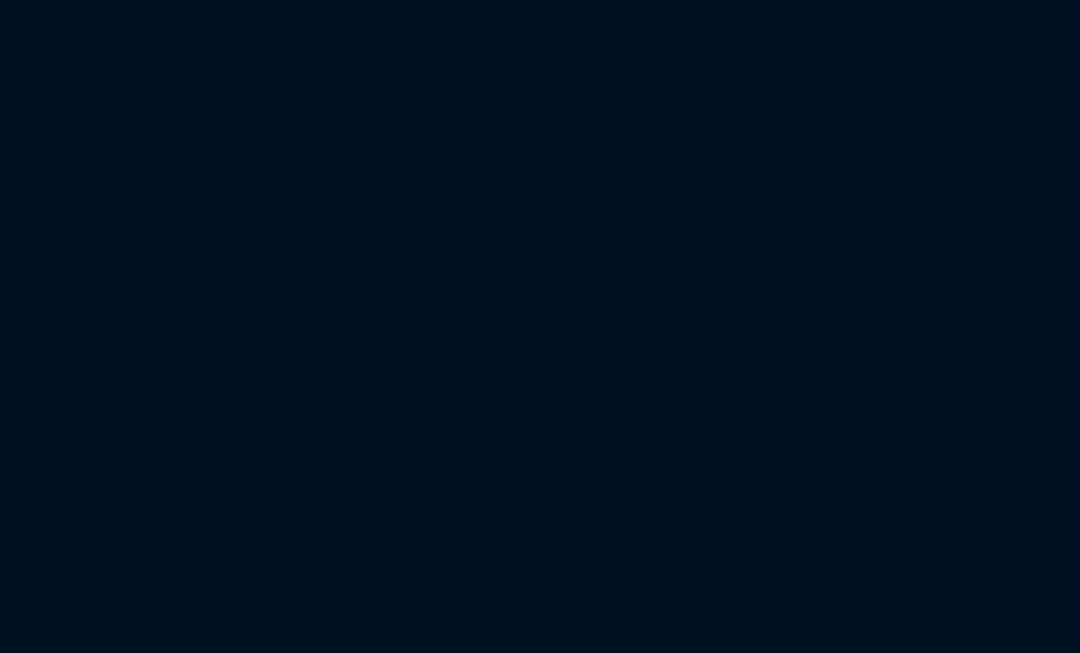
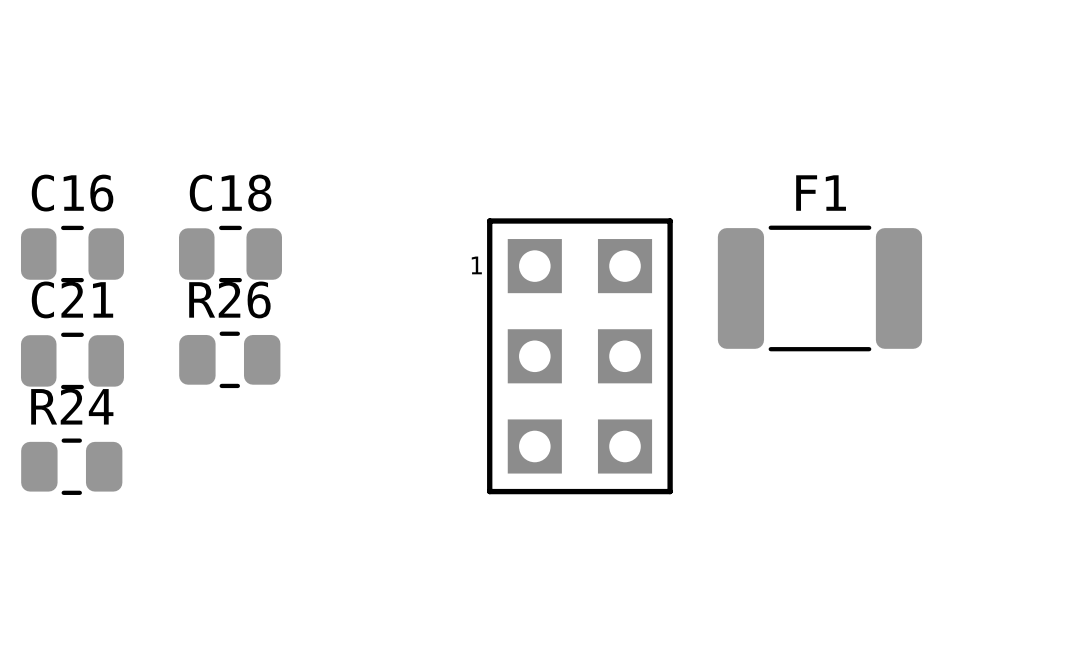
C16: none -> (72, 254)
C18: none -> (230, 254)
F1: none -> (819, 288)
part: none -> (579, 356)
R26: none -> (229, 359)
C21: none -> (72, 360)
R24: none -> (71, 466)

